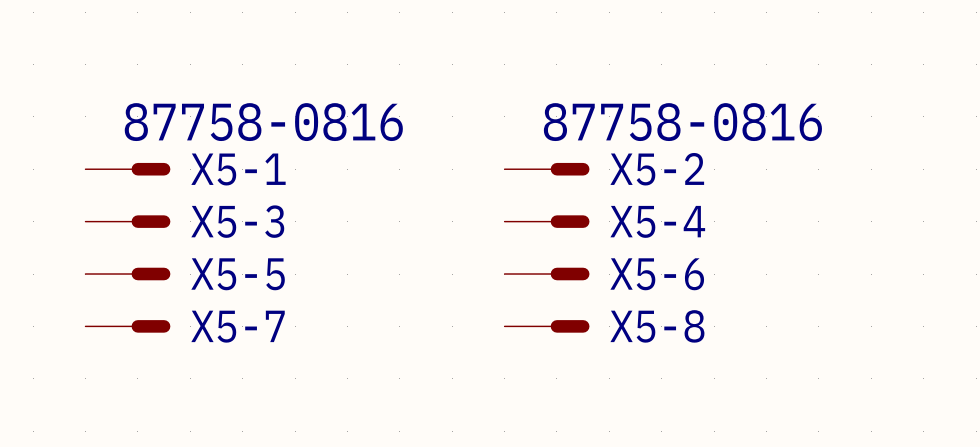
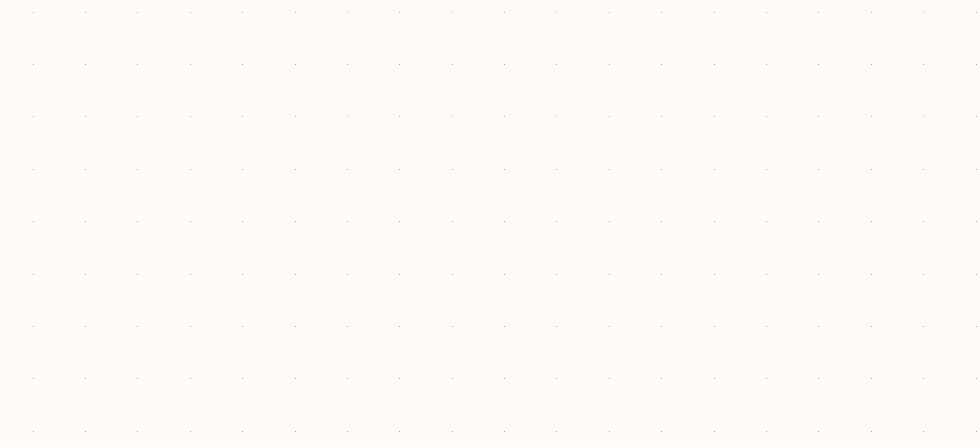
X5-1: 87758-0816 (127, 169) -> none
X5-2: 87758-0816 (547, 169) -> none
X5-3: (127, 221) -> none
X5-4: (547, 221) -> none
X5-5: (127, 274) -> none
X5-6: (547, 274) -> none
X5-7: (127, 326) -> none
X5-8: (547, 326) -> none

